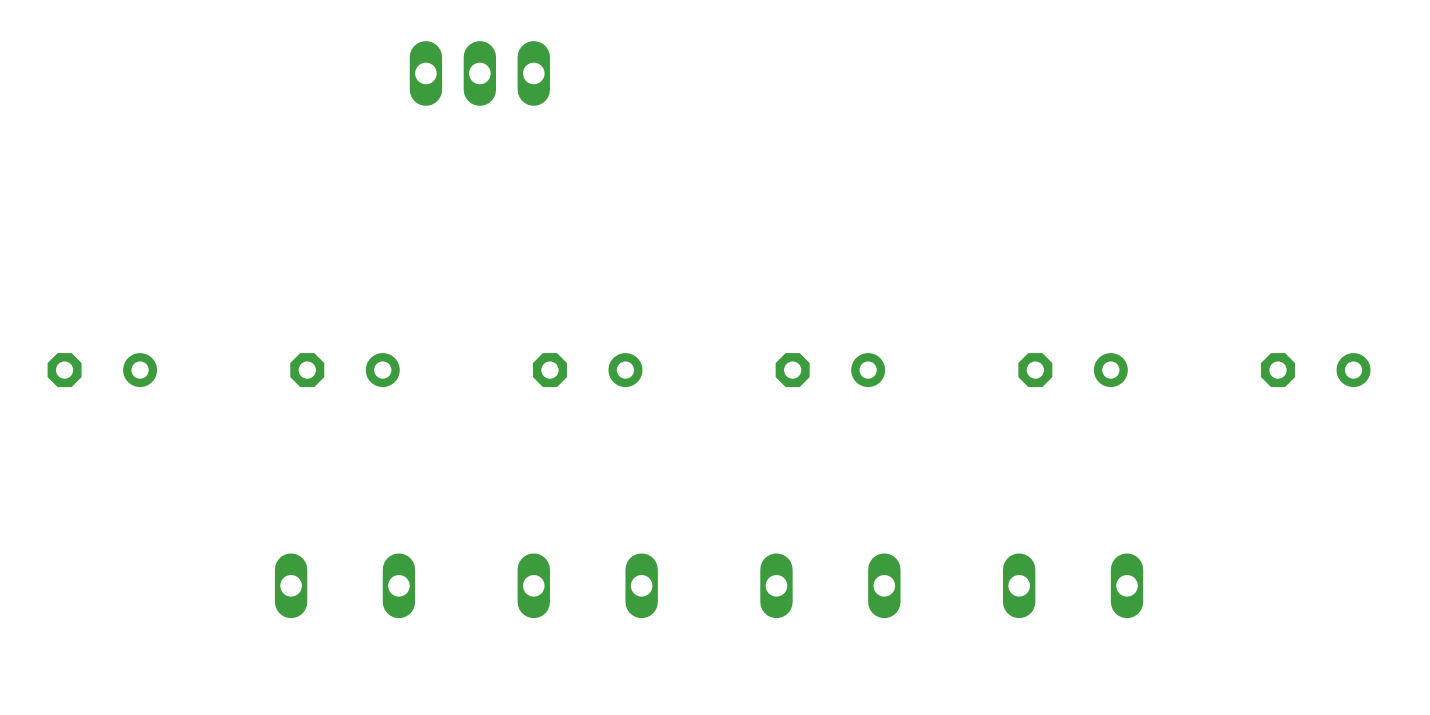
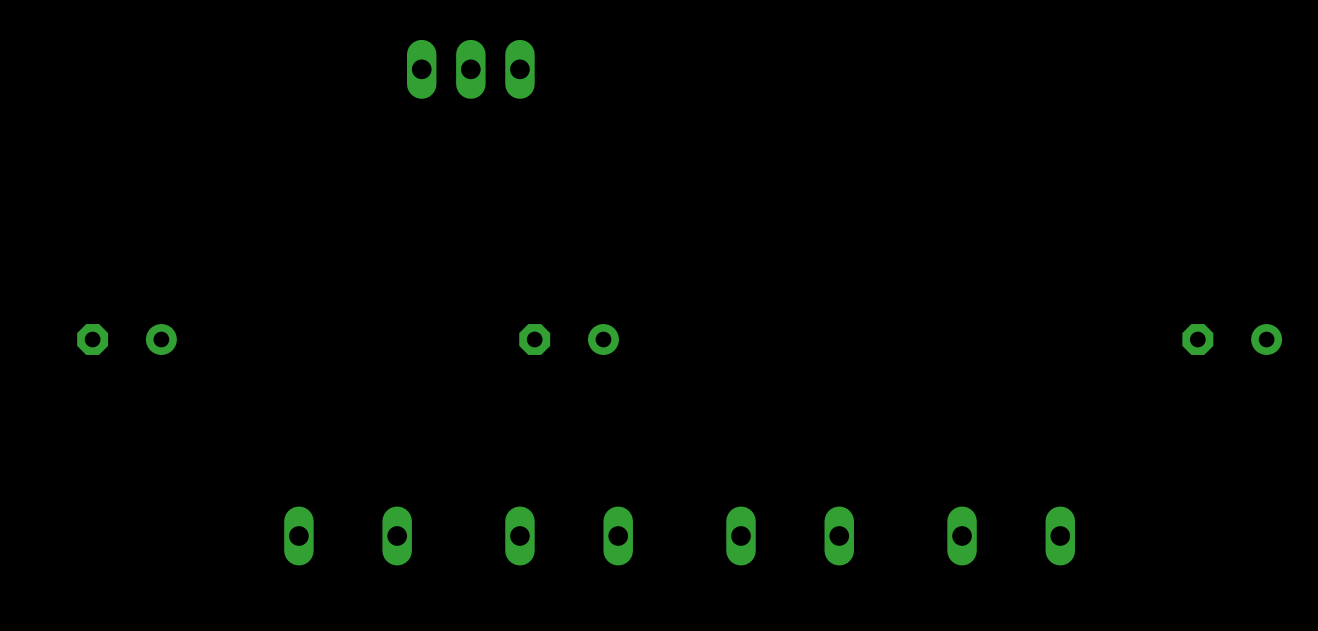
part: (345, 370) -> none
part: (830, 370) -> none
part: (1073, 370) -> none

